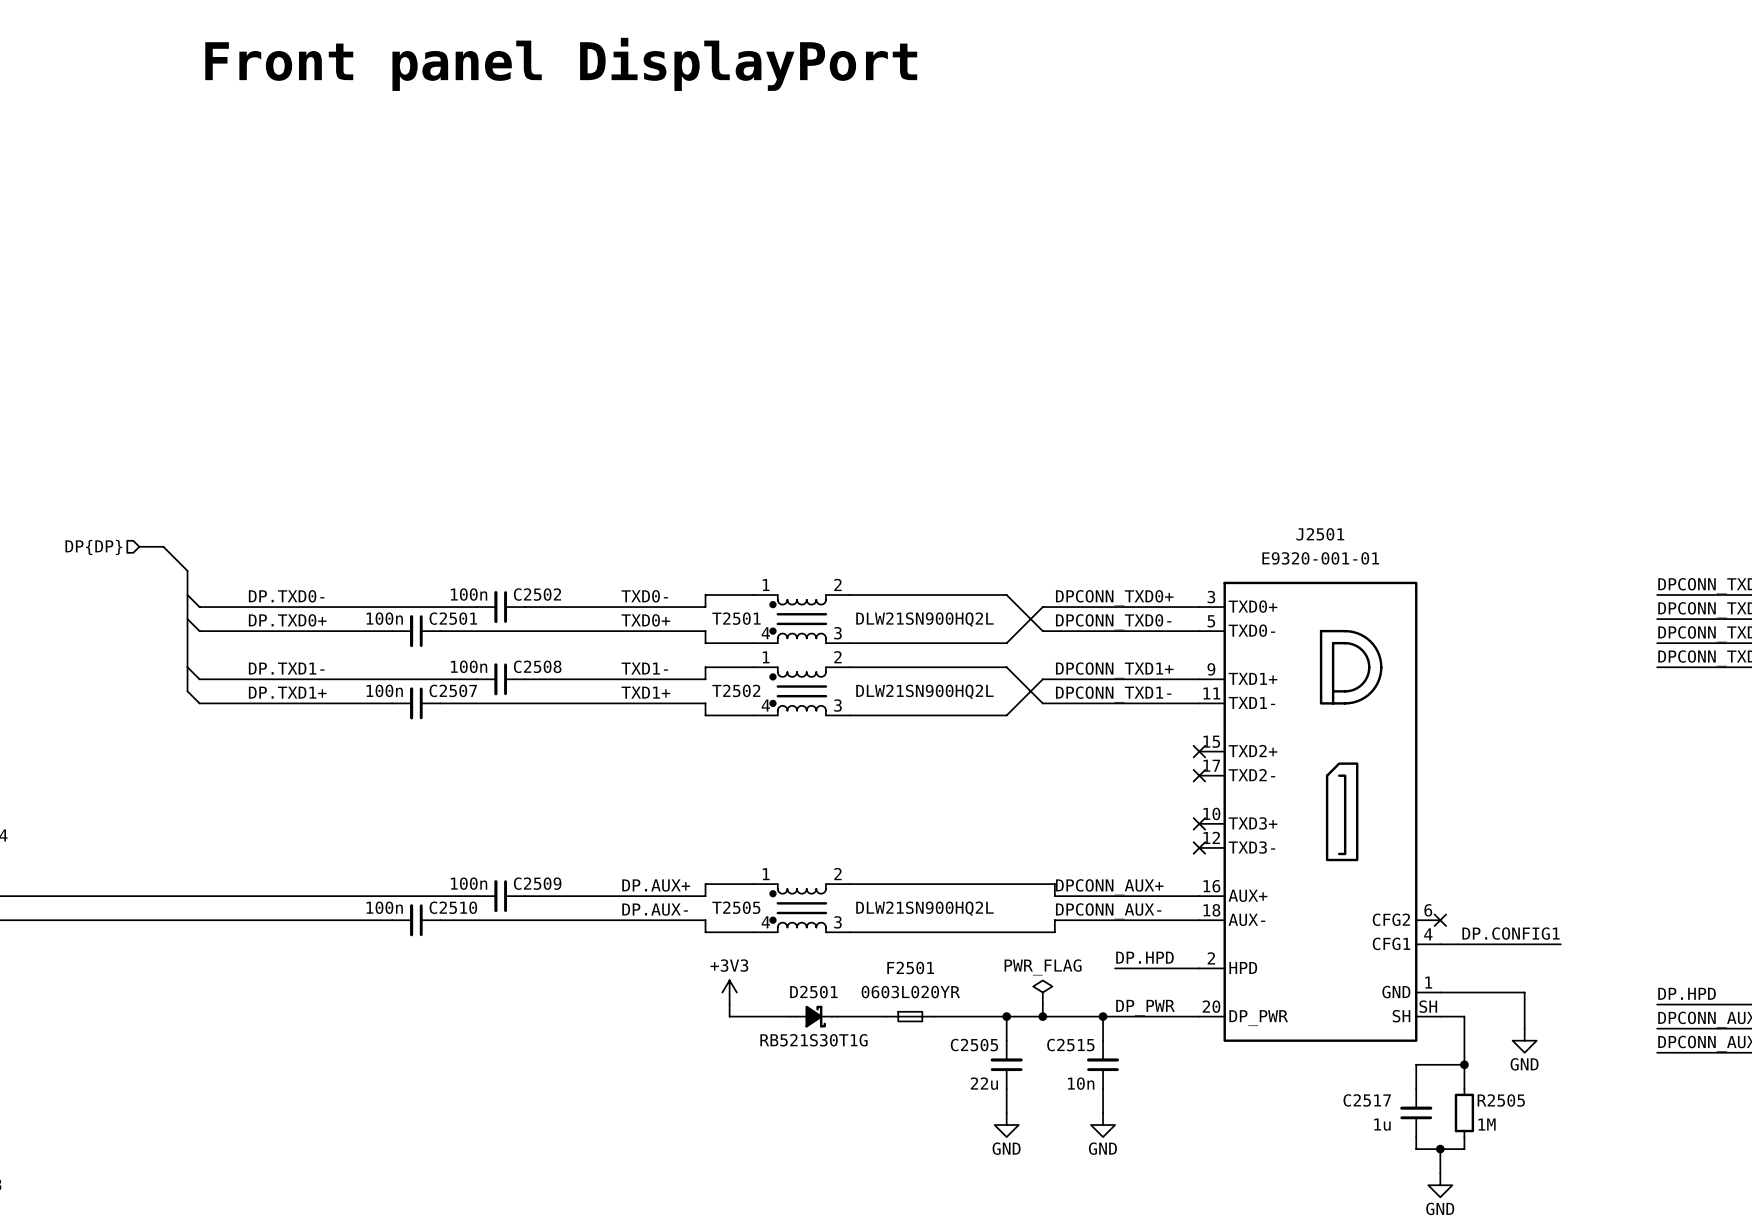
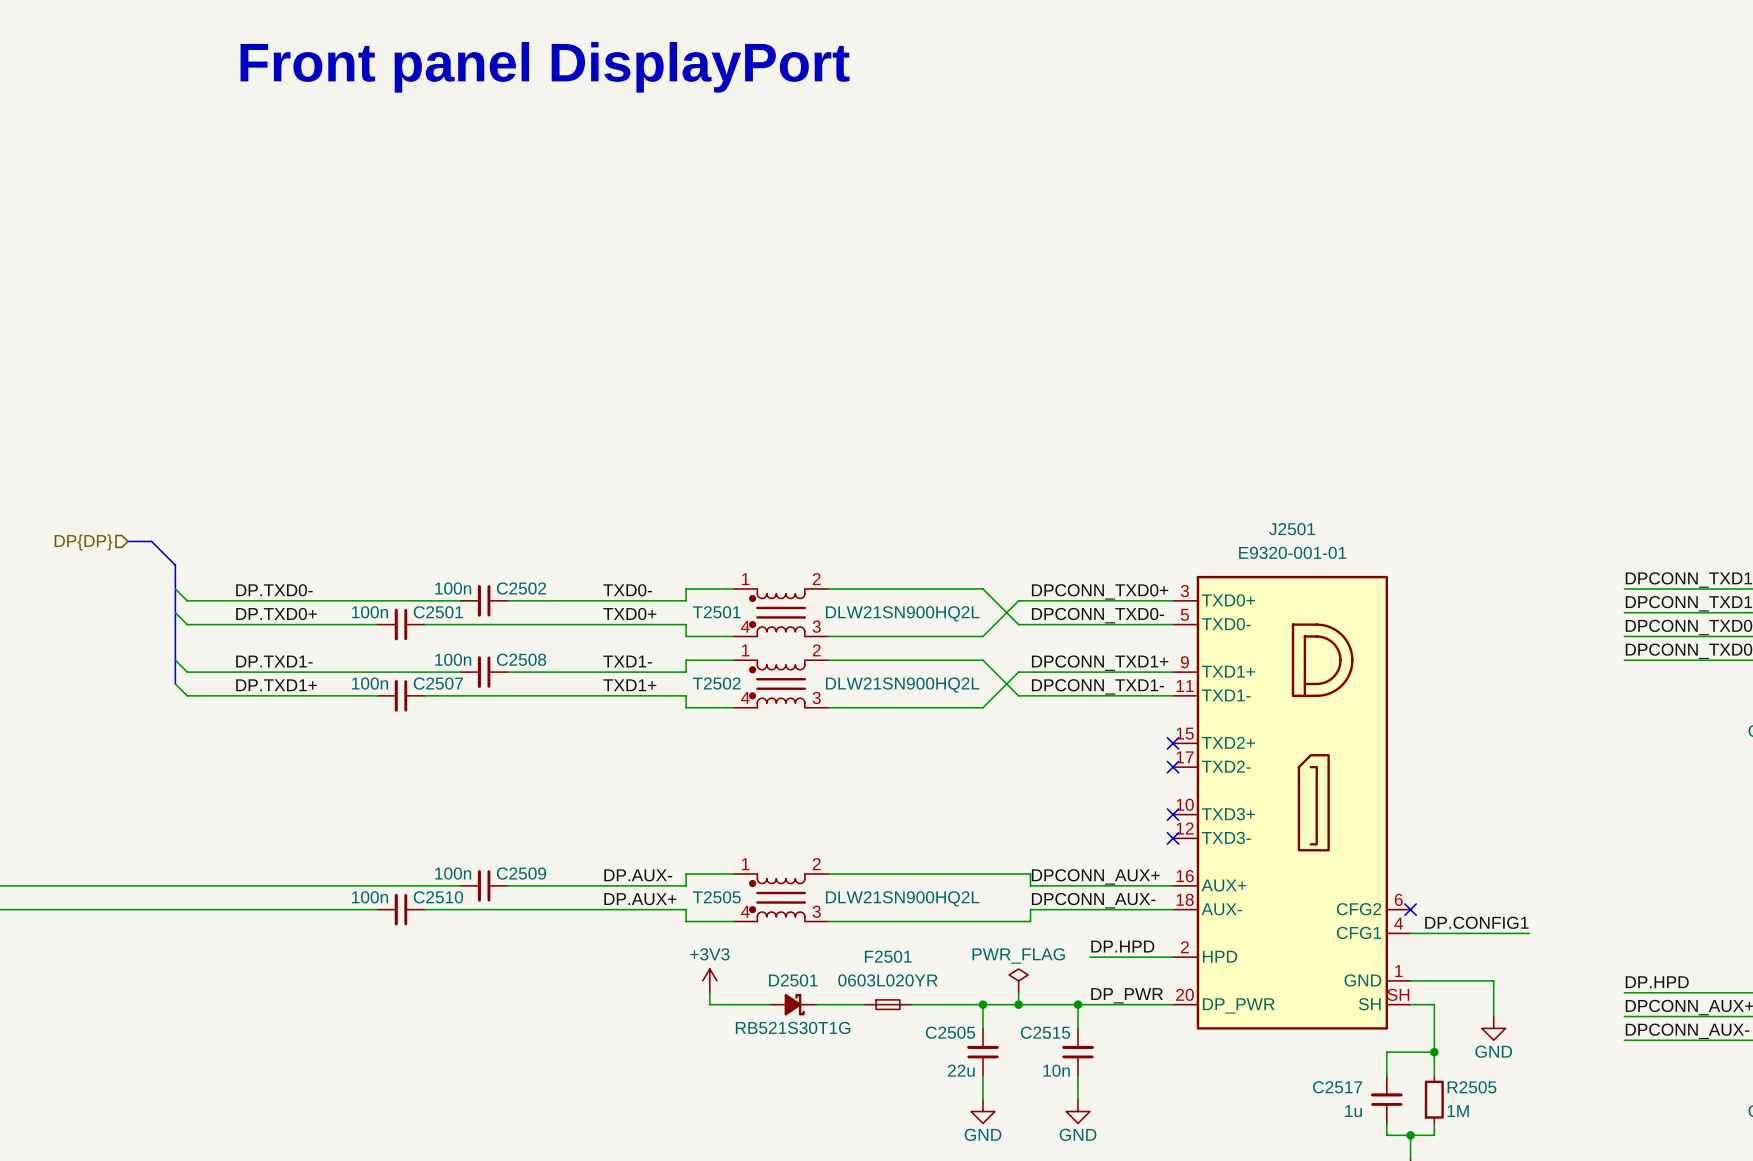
label: DP.AUX+ (656, 885) -> DP.AUX- (638, 875)
label: DP.AUX- (655, 909) -> DP.AUX+ (640, 899)

